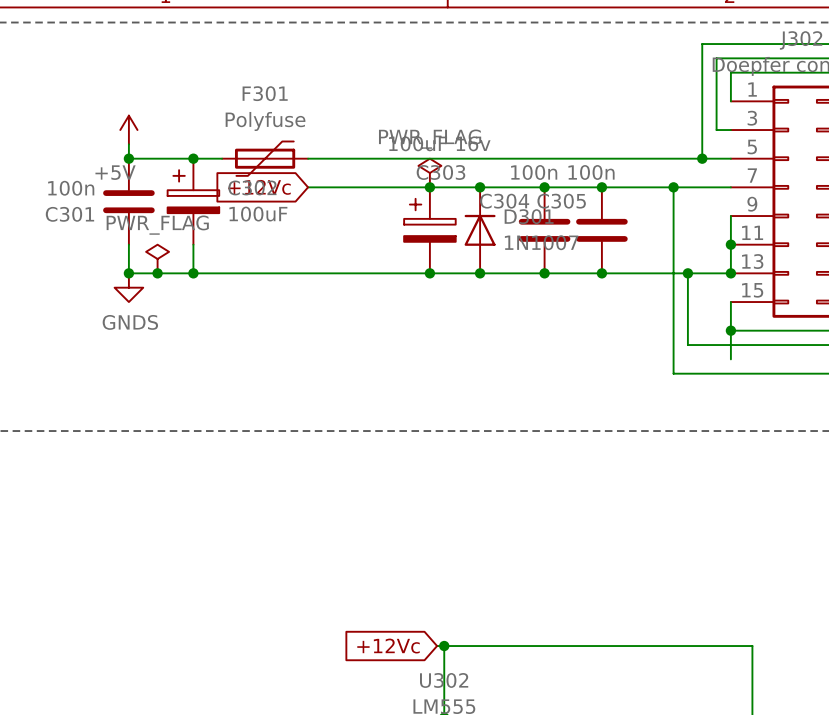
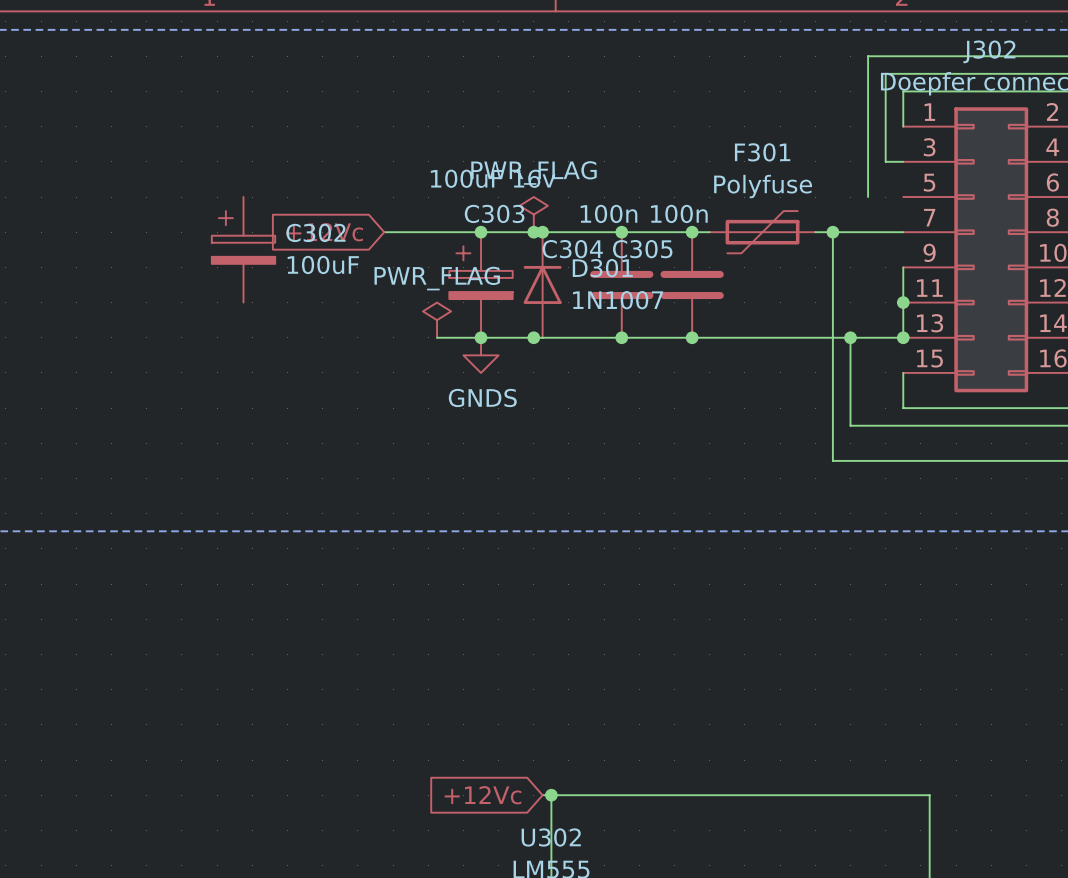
power symbol: +5V (128, 130) -> none
wire: (128, 144) (128, 158) (222, 158) -> none
junction: (128, 158) -> none
junction: (193, 158) -> none
F301 position: (265, 158) -> (762, 232)
wire: (308, 158) (730, 158) -> none
junction: (702, 158) -> none
junction: none -> (481, 232)
junction: none -> (542, 232)
junction: (480, 187) -> none
junction: none -> (621, 232)
junction position: (544, 187) -> (692, 232)
junction: (601, 187) -> none
C301: 100n (128, 201) -> none
C303 position: (429, 230) -> (481, 284)
D301 position: (480, 230) -> (542, 284)
C304 position: (544, 230) -> (621, 284)
C305 position: (601, 230) -> (692, 284)
wire: (128, 244) (128, 273) (351, 273) -> none
wire: (193, 244) (193, 273) -> none
power symbol position: PWR_FLAG (157, 259) -> PWR_FLAG (437, 320)
junction: (128, 273) -> none
junction: (157, 273) -> none
junction: (193, 273) -> none
junction: none -> (481, 337)
junction: (480, 273) -> none
junction: none -> (621, 337)
junction position: (544, 273) -> (692, 337)
junction: (601, 273) -> none
power symbol position: GNDS (128, 287) -> GNDS (481, 355)
wire: (730, 330) (730, 359) -> none
junction: (730, 330) -> none

